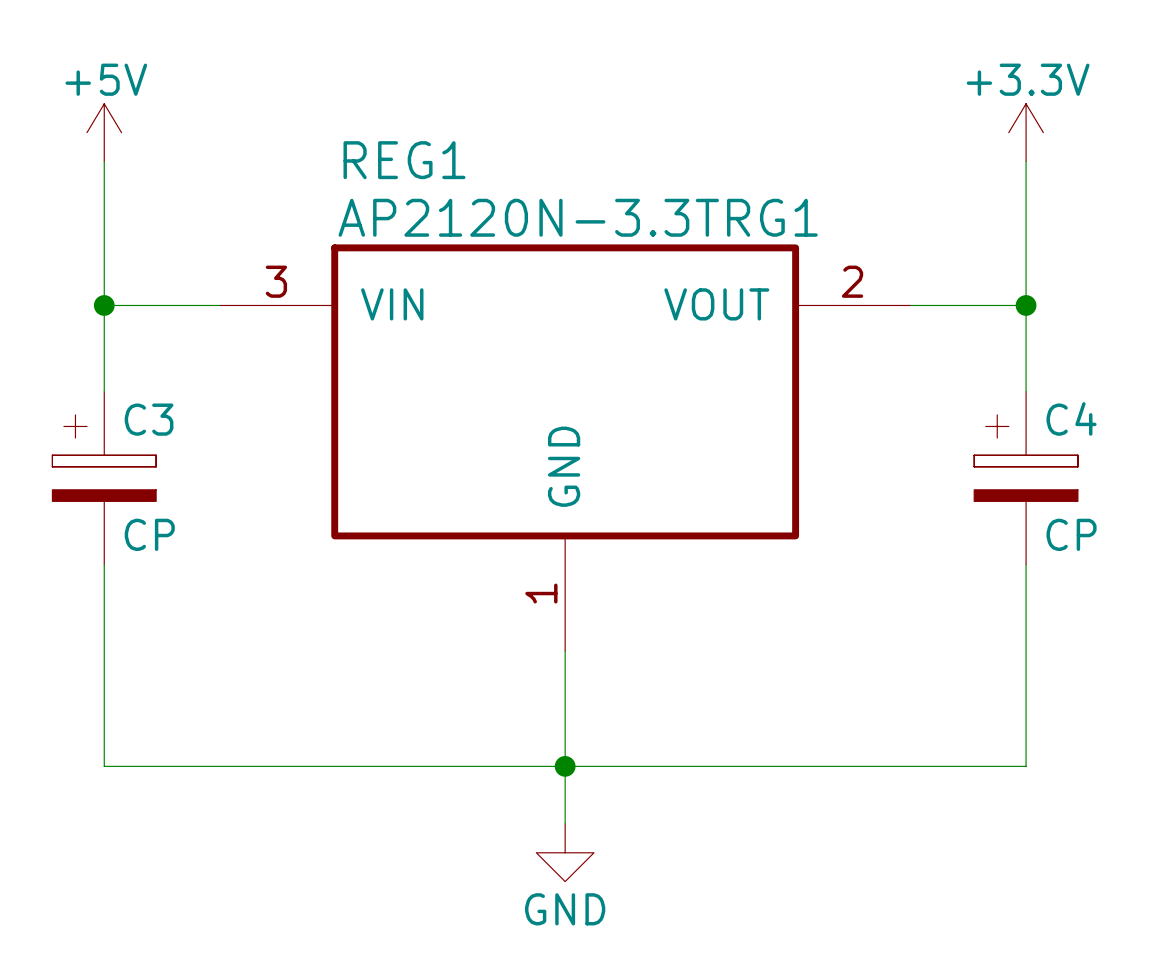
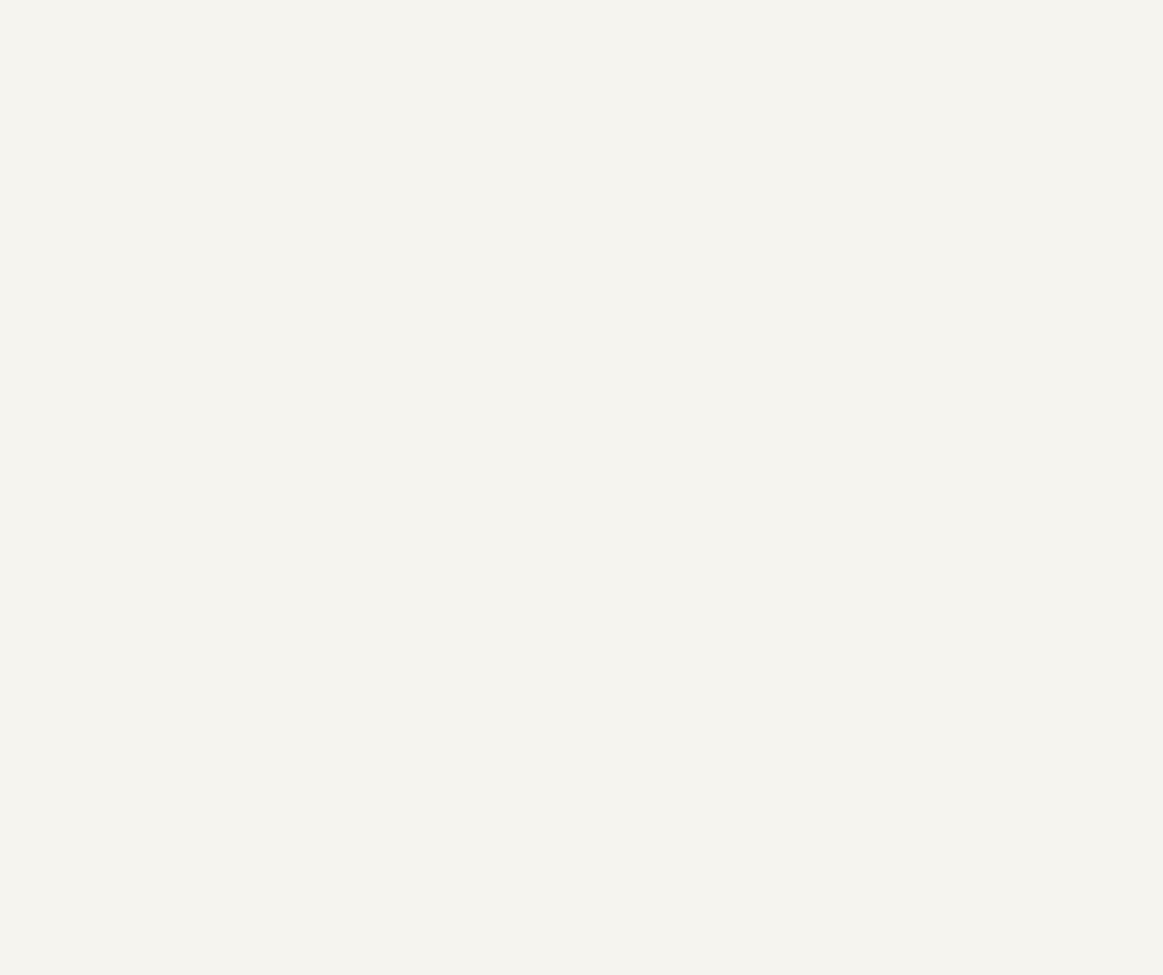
power symbol: +5V (104, 132) -> none
power symbol: +3.3V (1026, 132) -> none
wire: (104, 161) (104, 391) -> none
wire: (1026, 161) (1026, 391) -> none
wire: (104, 305) (219, 305) -> none
junction: (104, 305) -> none
wire: (910, 305) (1026, 305) -> none
junction: (1026, 305) -> none
REG1: AP2120N-3.3TRG1 (565, 447) -> none
C3: CP (104, 478) -> none
C4: CP (1026, 478) -> none
wire: (104, 564) (104, 766) (1026, 766) (1026, 564) -> none
wire: (565, 651) (565, 823) -> none
junction: (565, 766) -> none
power symbol: GND (565, 852) -> none

